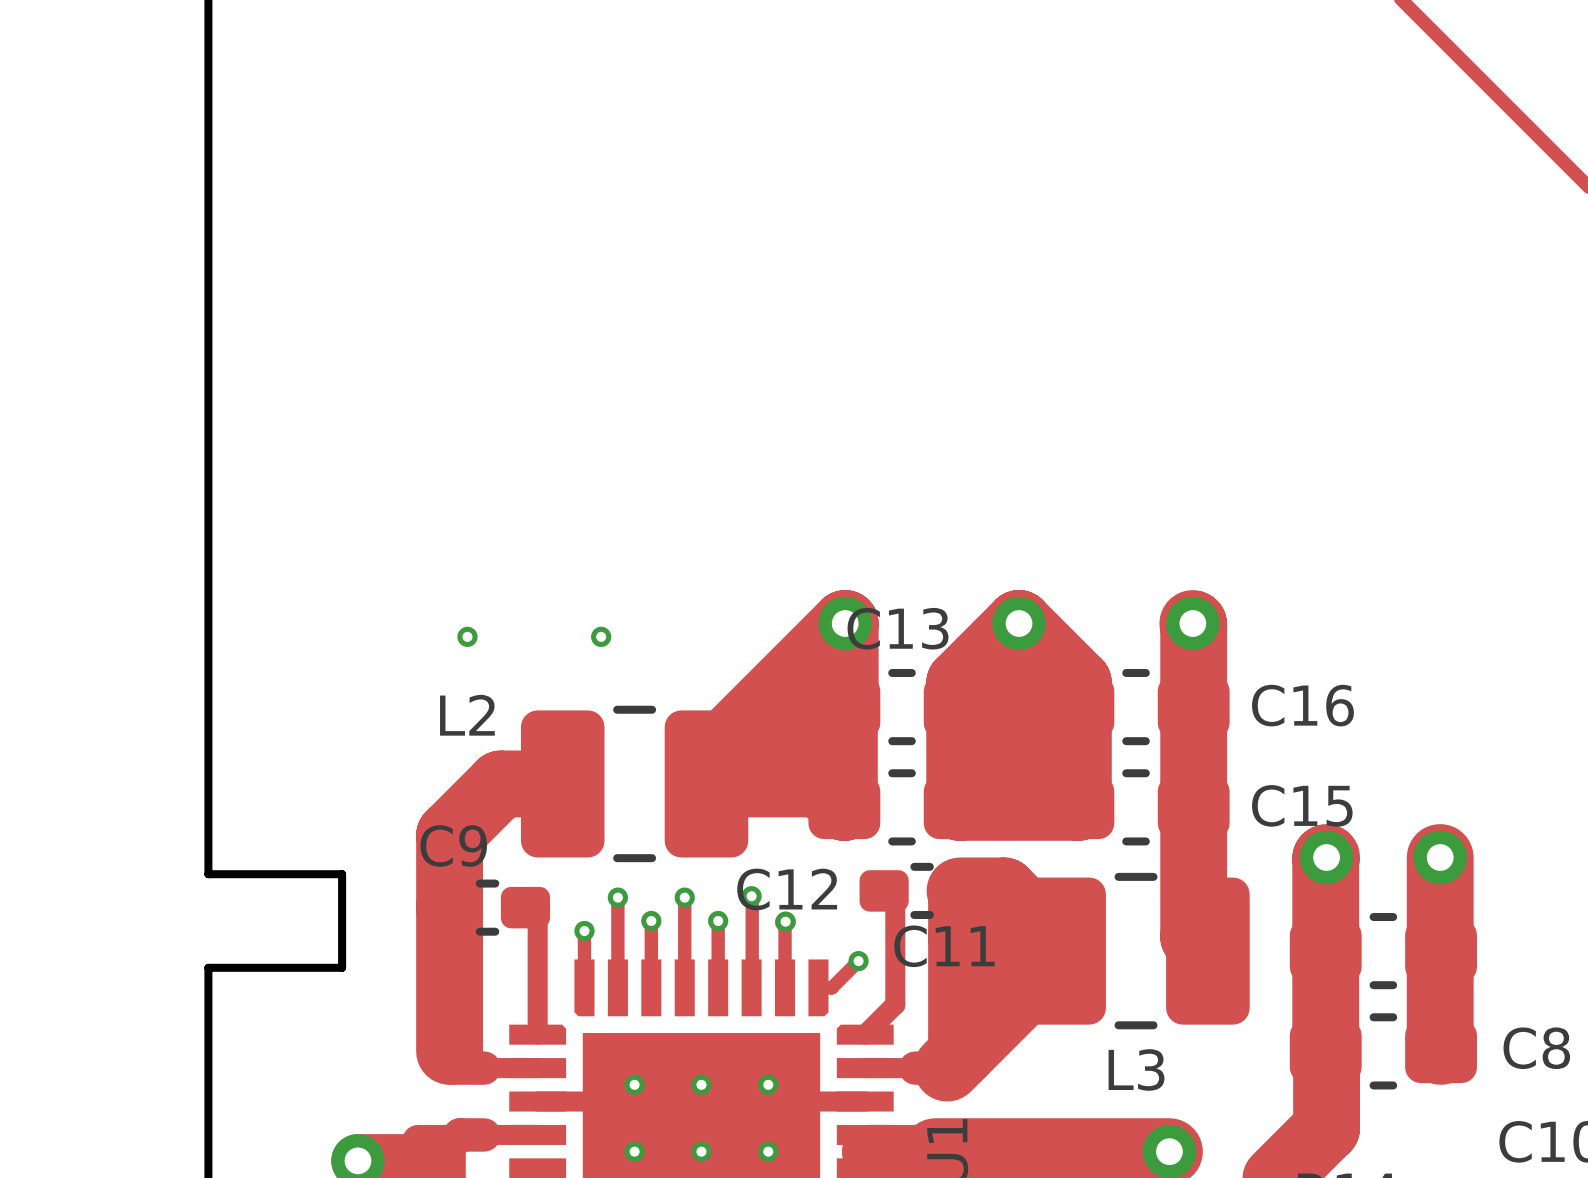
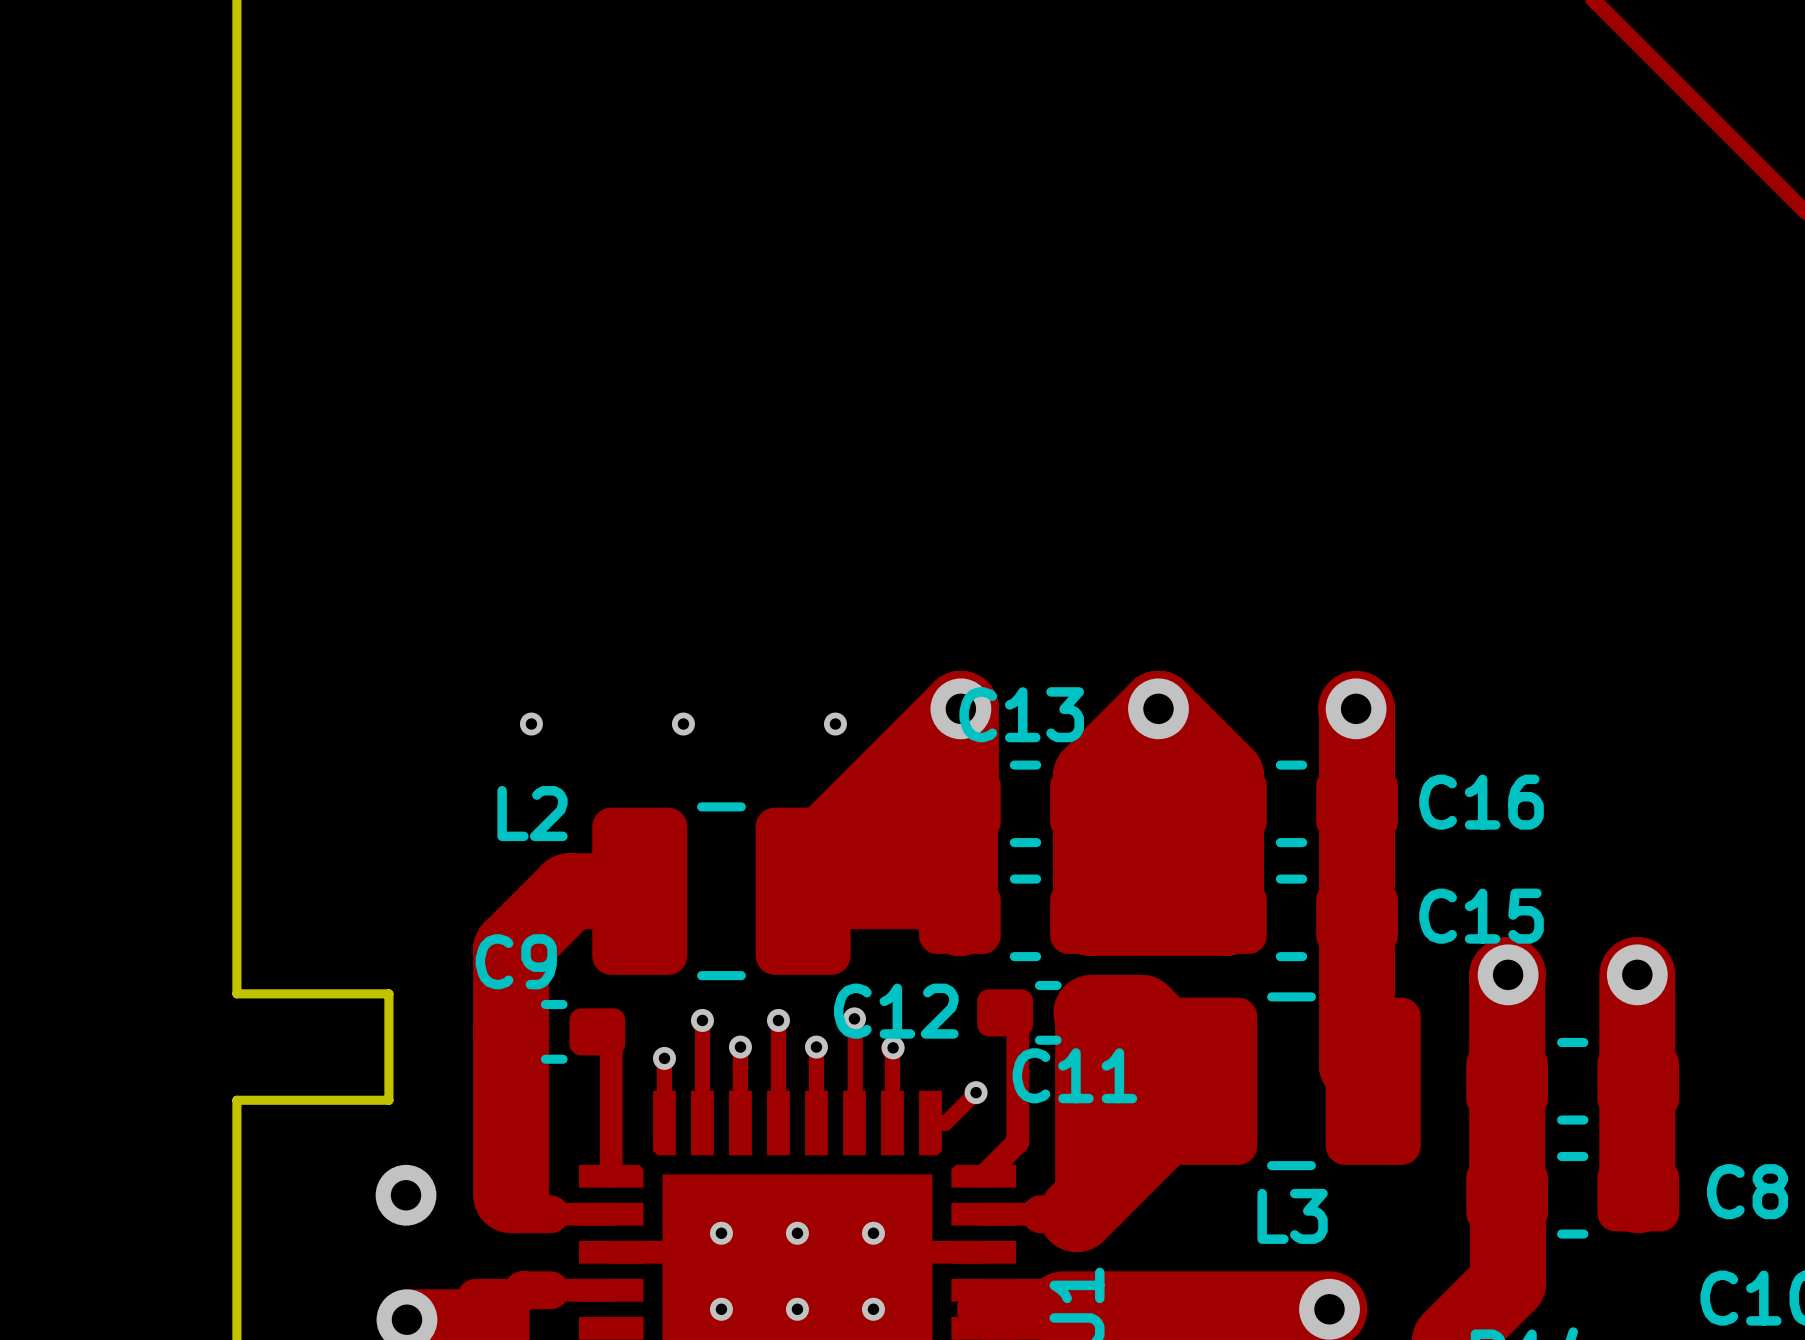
via: none -> (835, 724)
via: none -> (406, 1195)

